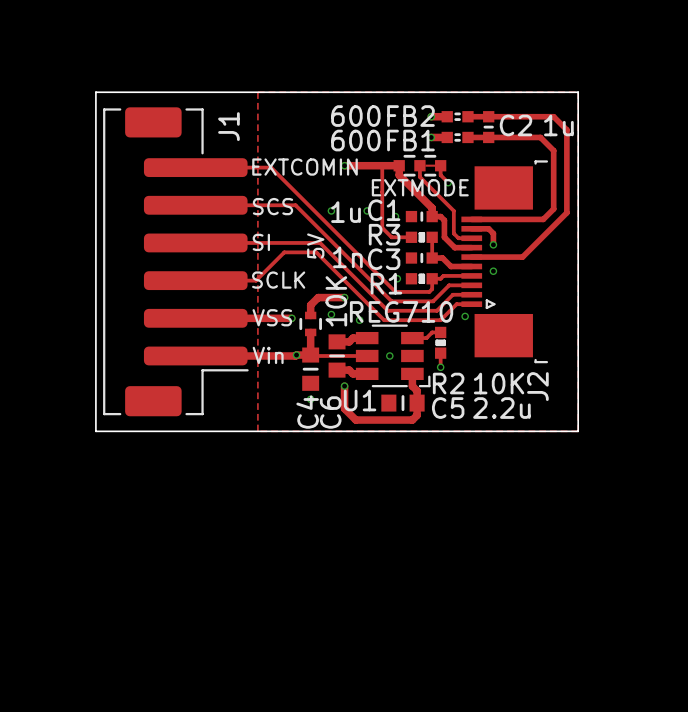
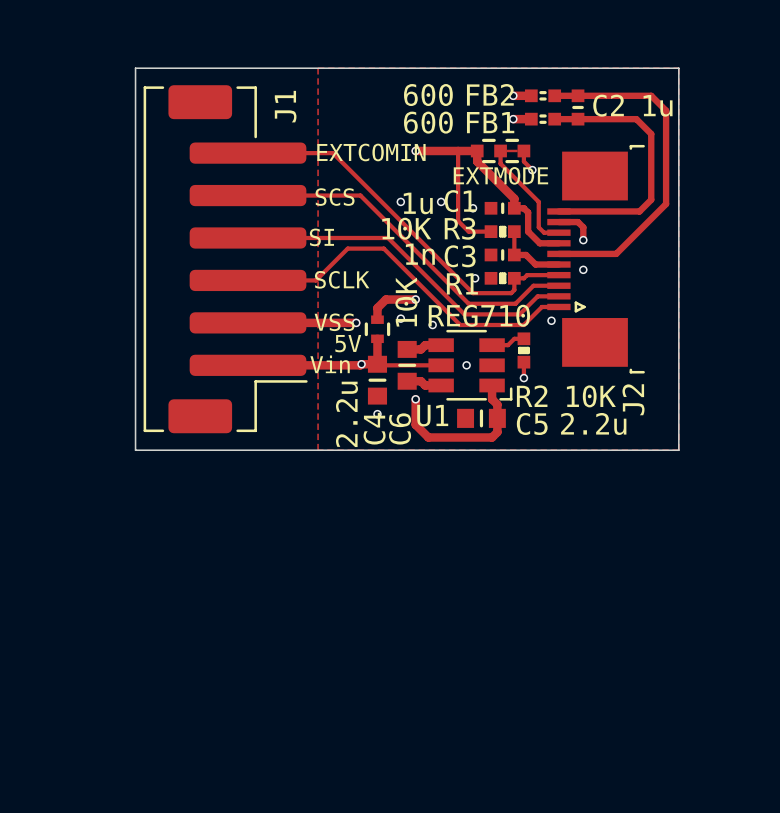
R3 value: none -> 10K (406, 228)
part value rotation: 0° (315, 246) -> 90° clockwise (348, 343)
part value position: 5V (315, 246) -> 5V (348, 343)
C4 value: none -> 2.2u (346, 414)

